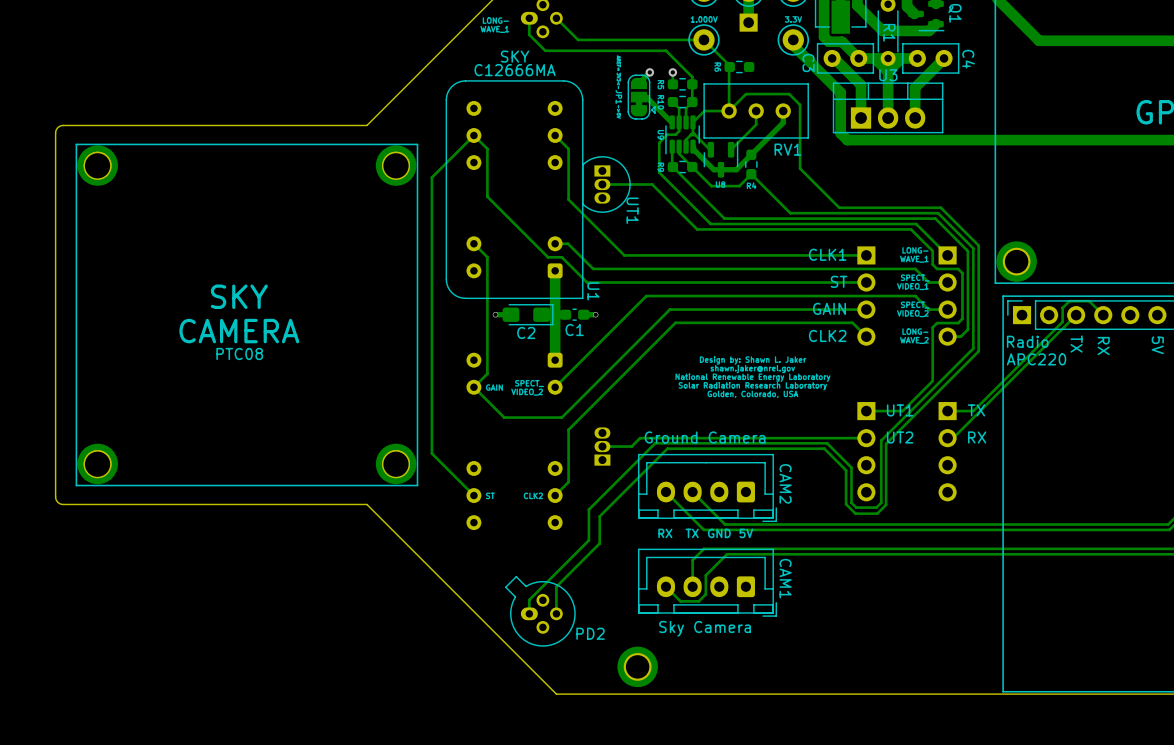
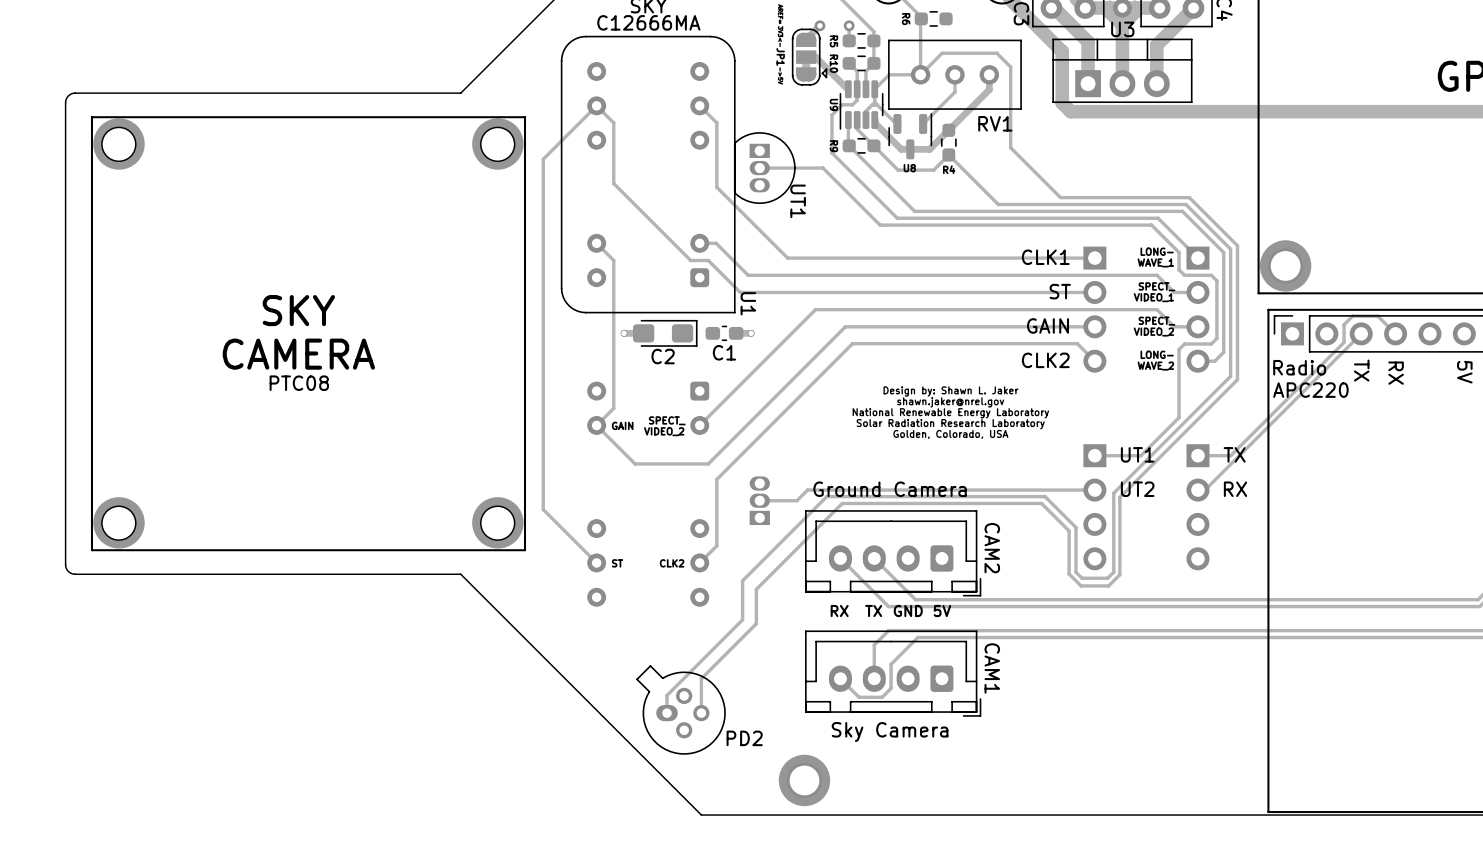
track: (555, 270) (555, 360) -> none

